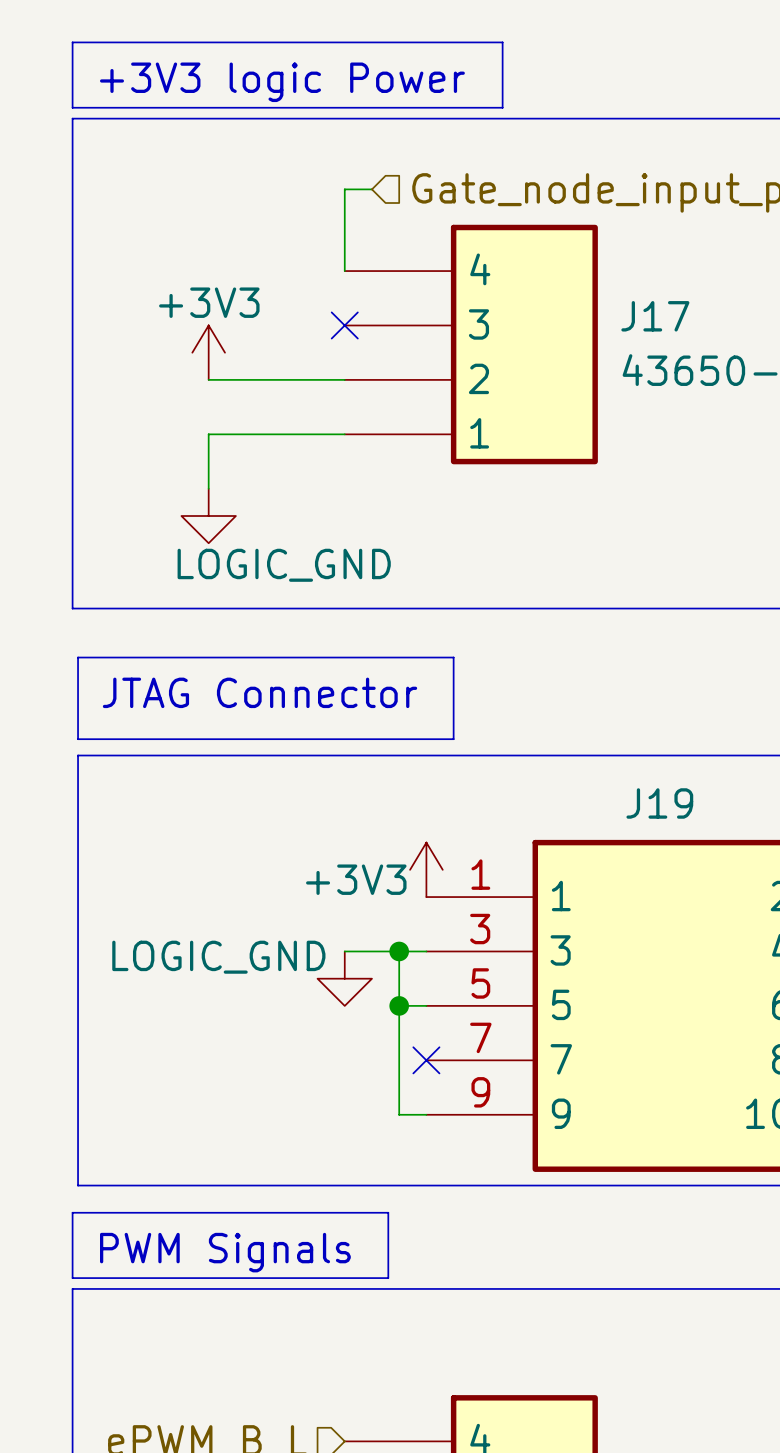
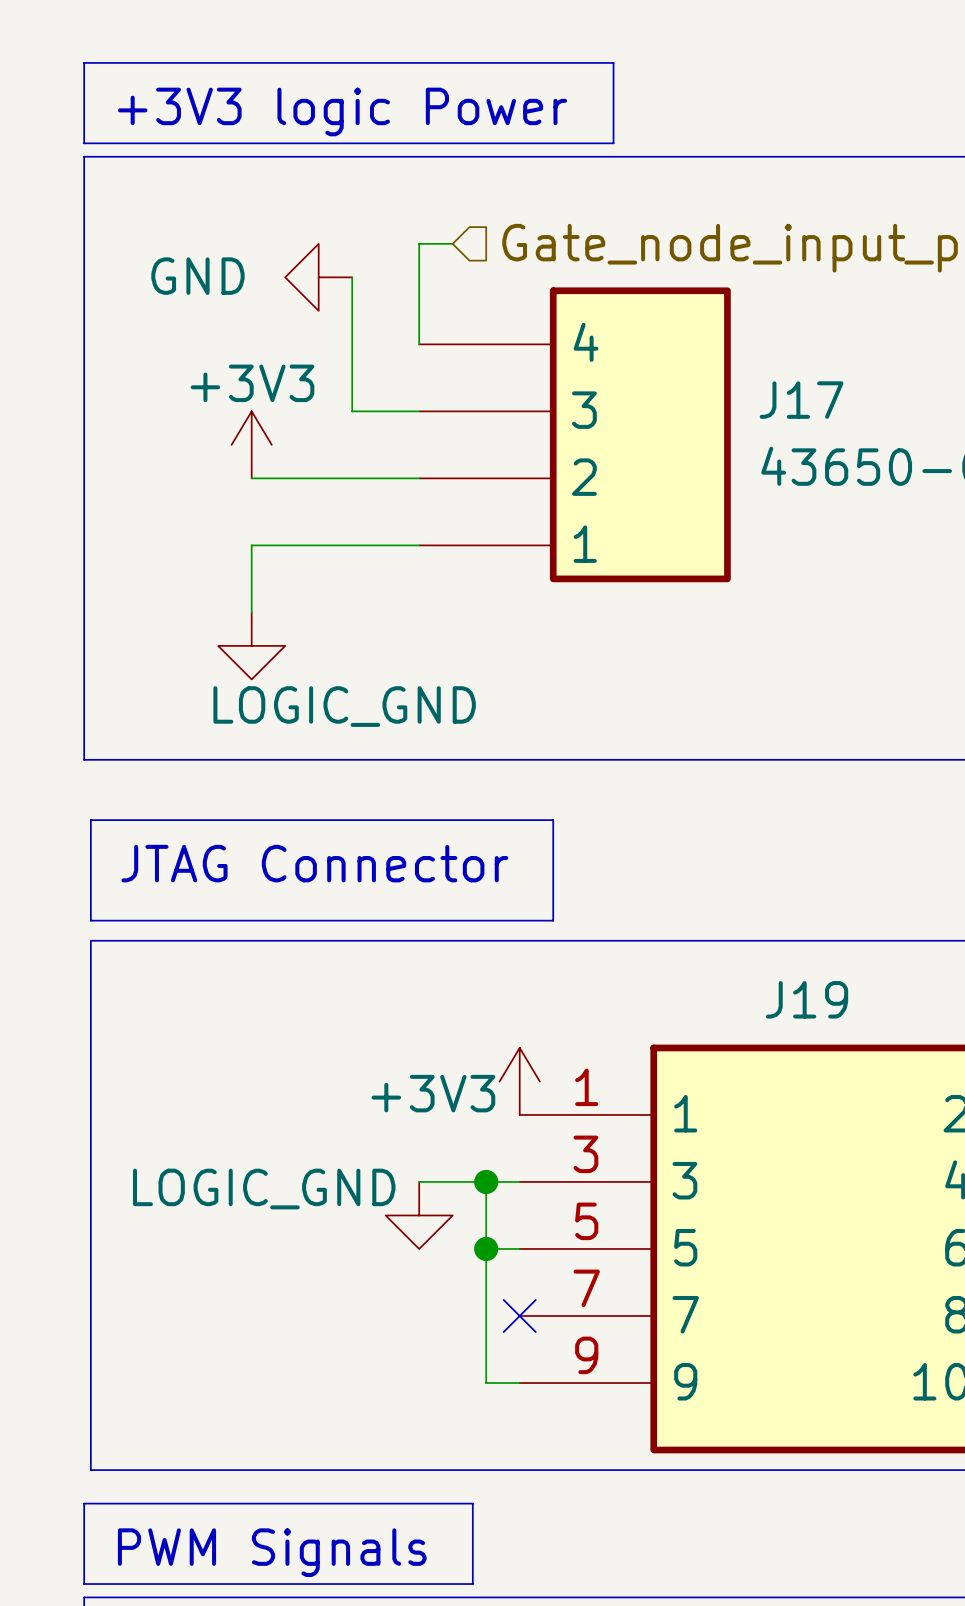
power symbol: none -> GND (318, 277)
wire: none -> (352, 277) (352, 411) (419, 411)
no-connect mark: (344, 325) -> none

